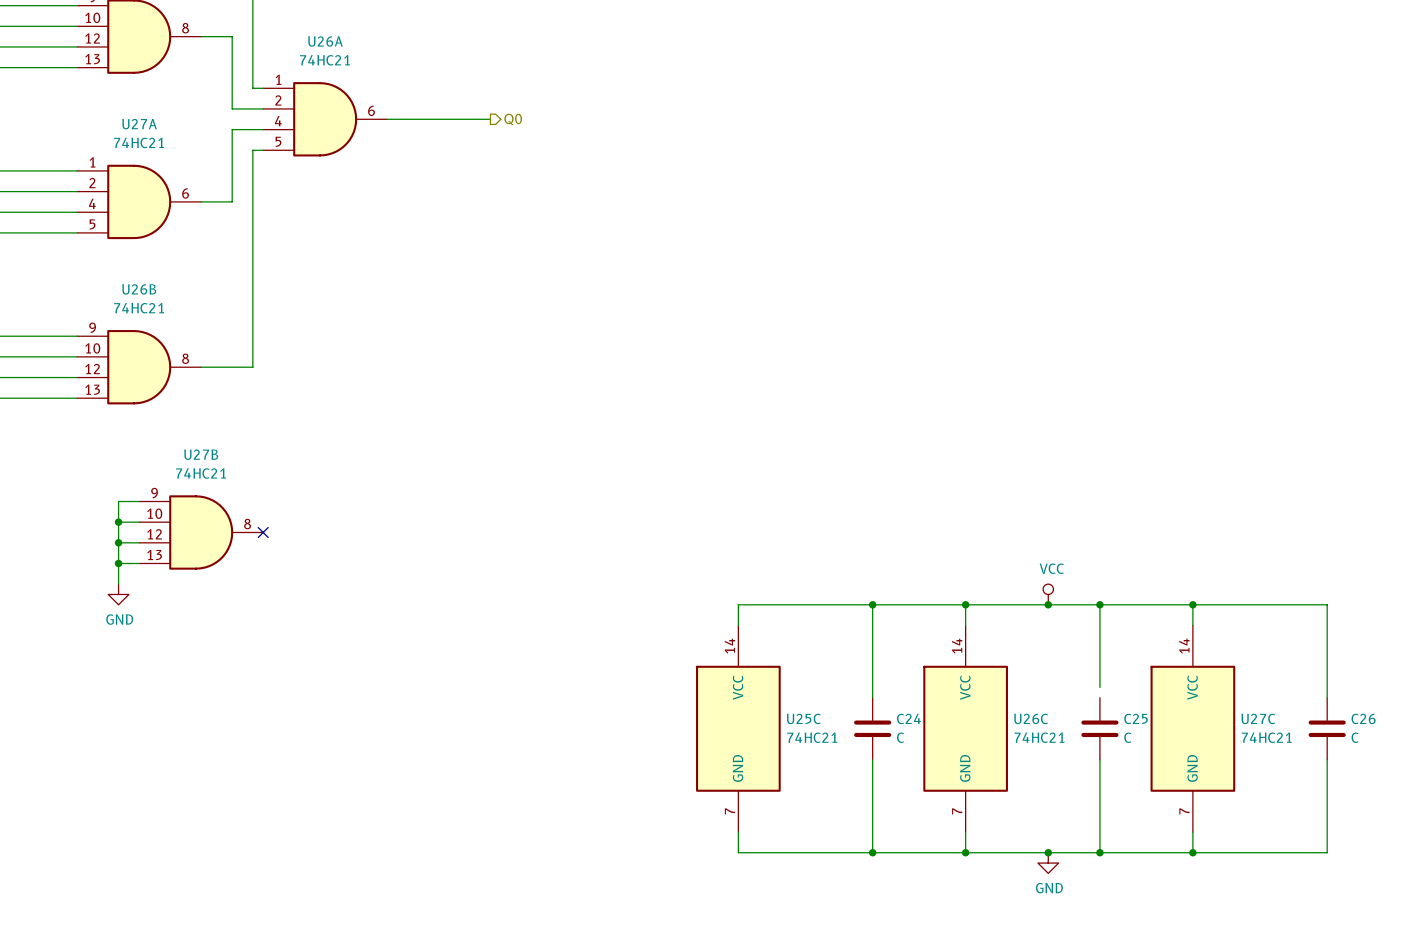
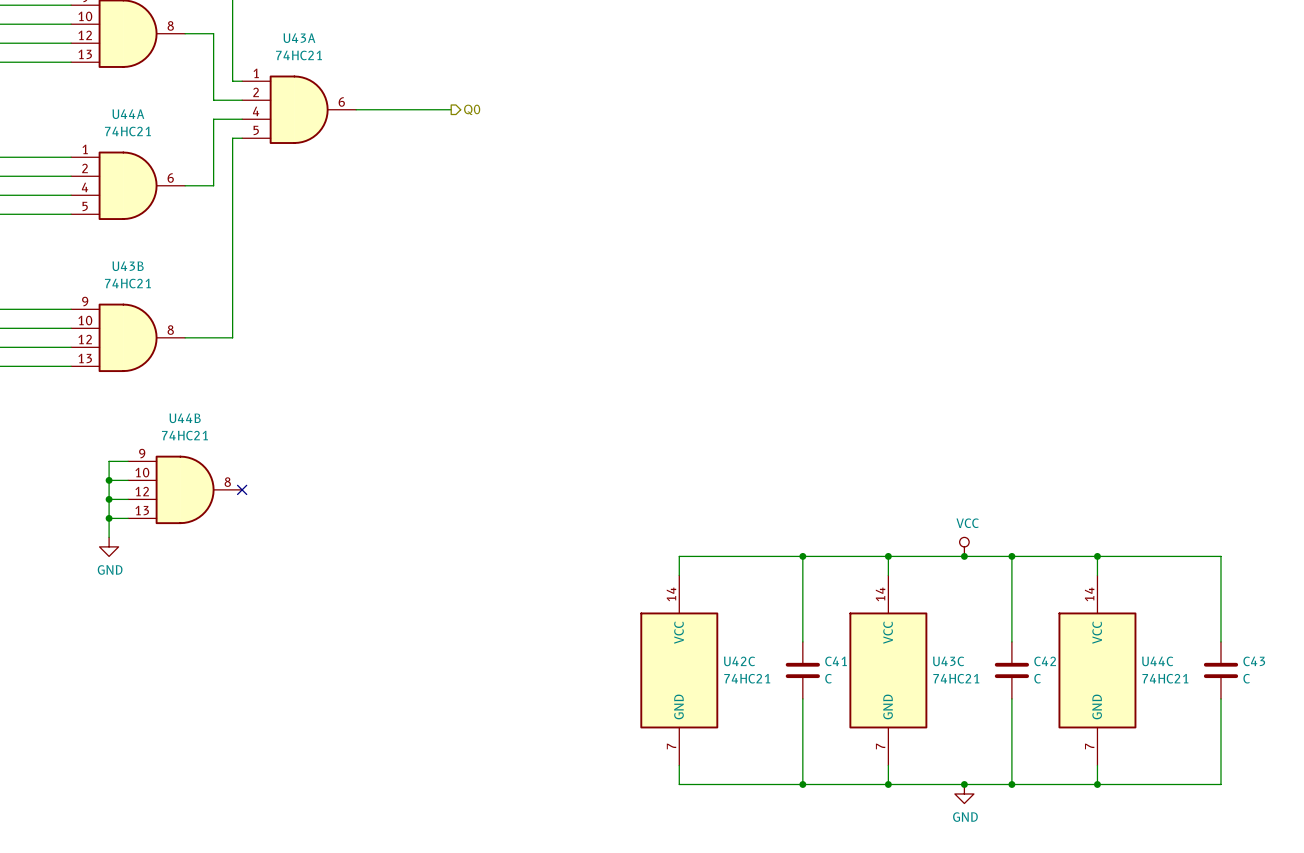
U26A name: U26A (325, 41) -> U43A (299, 38)
U27A name: U27A (139, 124) -> U44A (128, 114)
U26B name: U26B (139, 289) -> U43B (128, 266)
U27B name: U27B (201, 454) -> U44B (185, 418)
wire: none -> (1011, 632) (1011, 641)
U25C name: U25C (803, 718) -> U42C (739, 661)
C24 name: C24 (908, 718) -> C41 (836, 661)
U26C name: U26C (1031, 718) -> U43C (948, 661)
C25 name: C25 (1136, 718) -> C42 (1045, 661)
U27C name: U27C (1258, 718) -> U44C (1157, 661)
C26 name: C26 (1363, 718) -> C43 (1254, 661)

